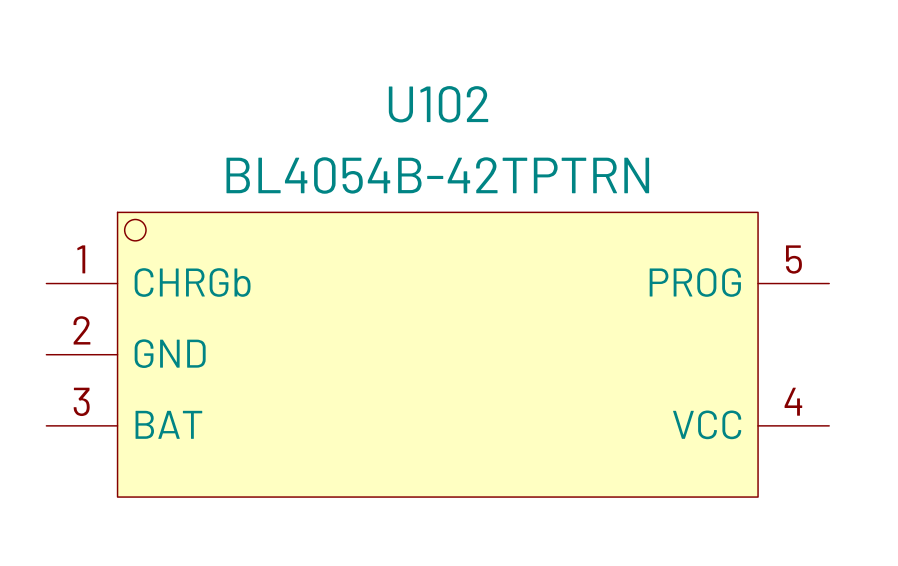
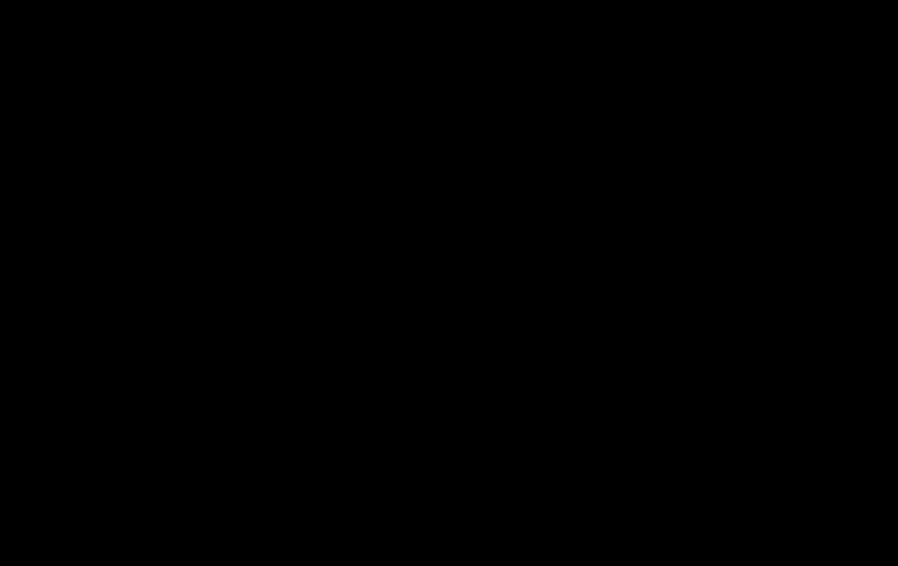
U102: BL4054B-42TPTRN (437, 354) -> none

